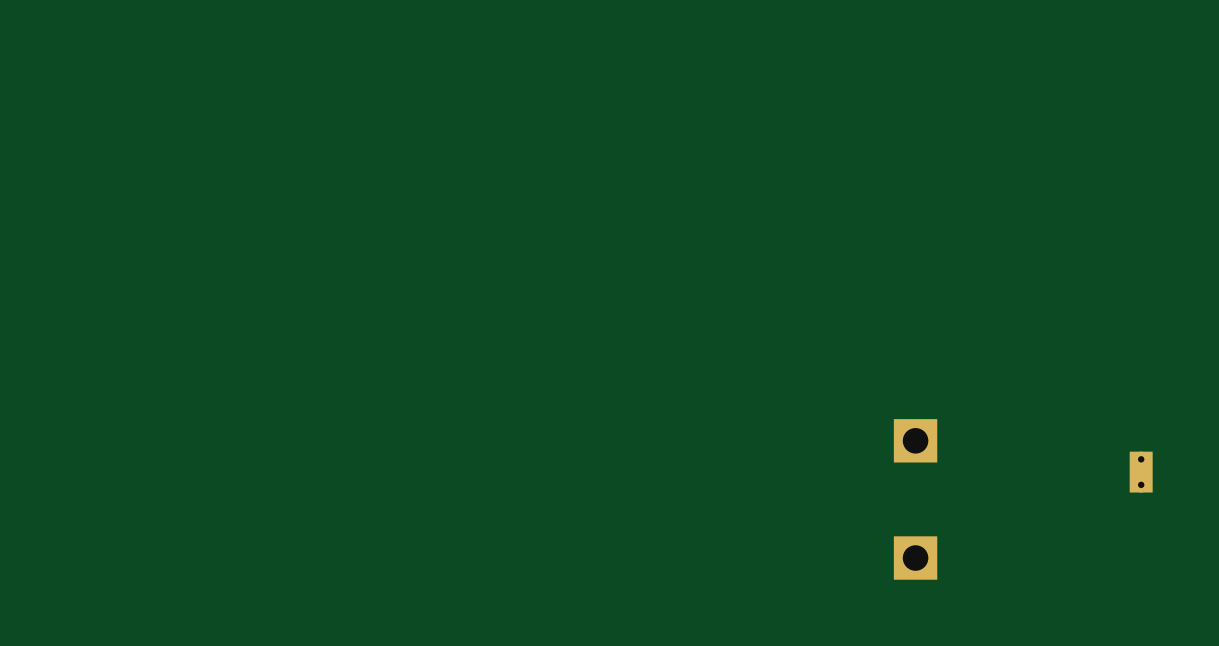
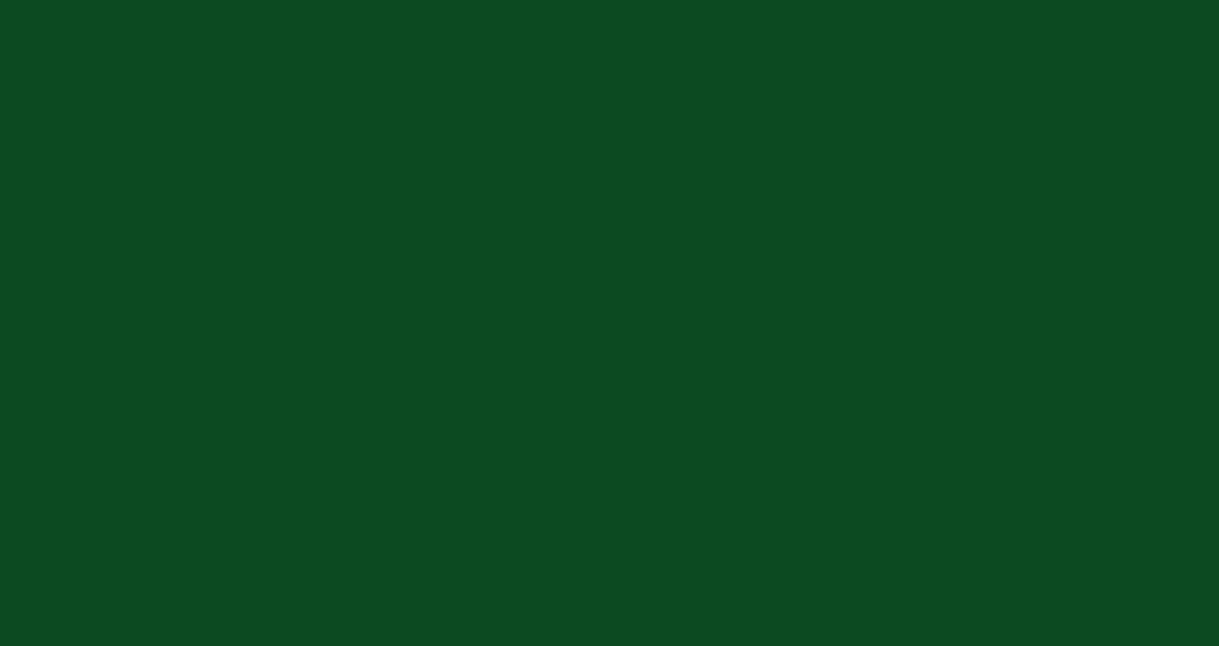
part: (915, 440) -> none
part: (1141, 472) -> none
part: (915, 558) -> none

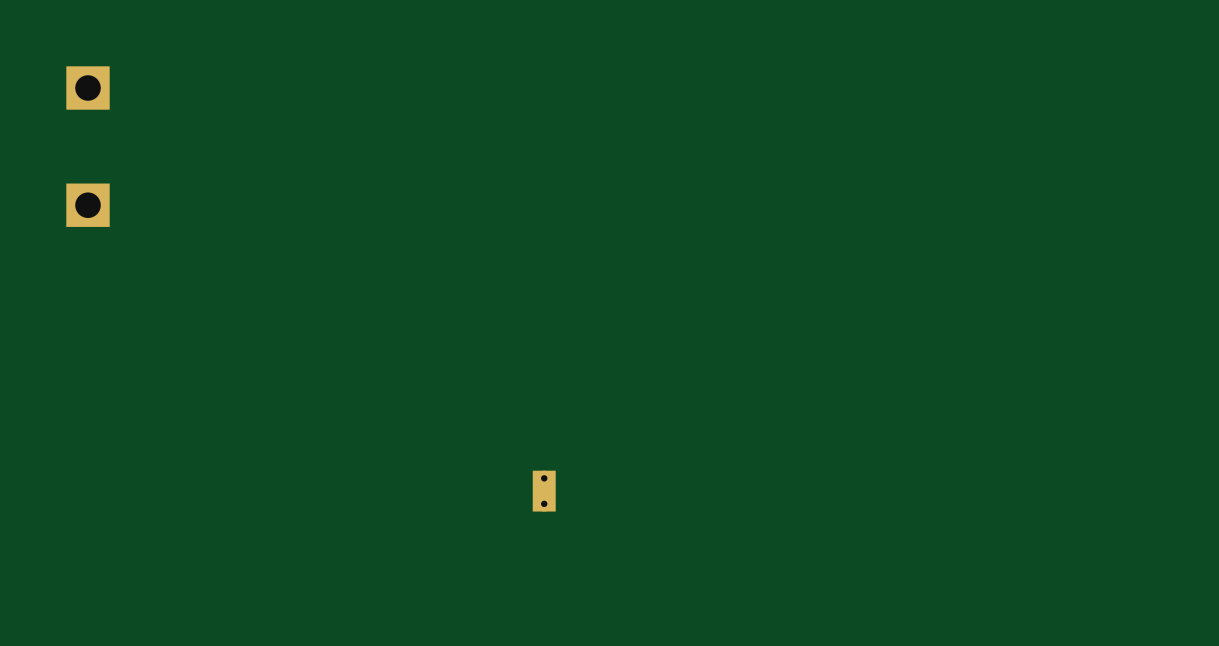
part: none -> (88, 88)
part: none -> (88, 205)
part: none -> (544, 491)

